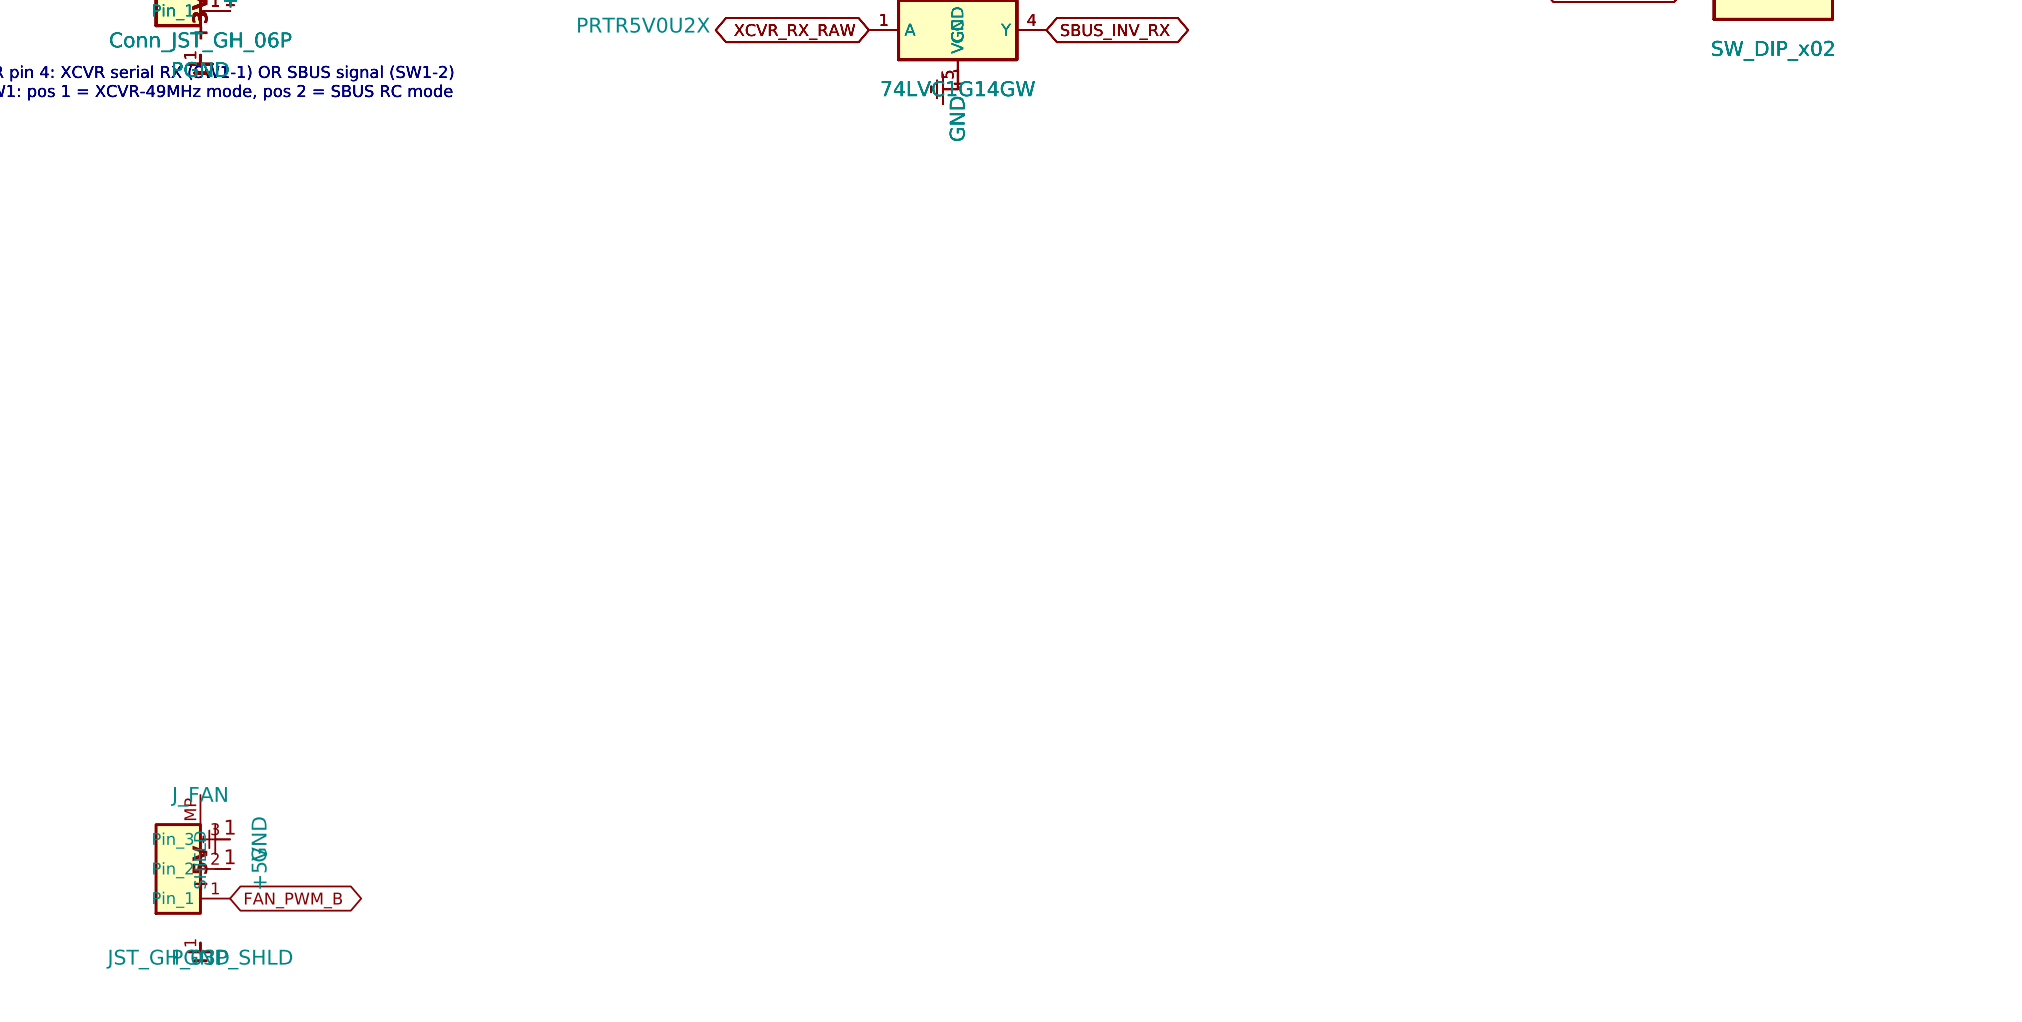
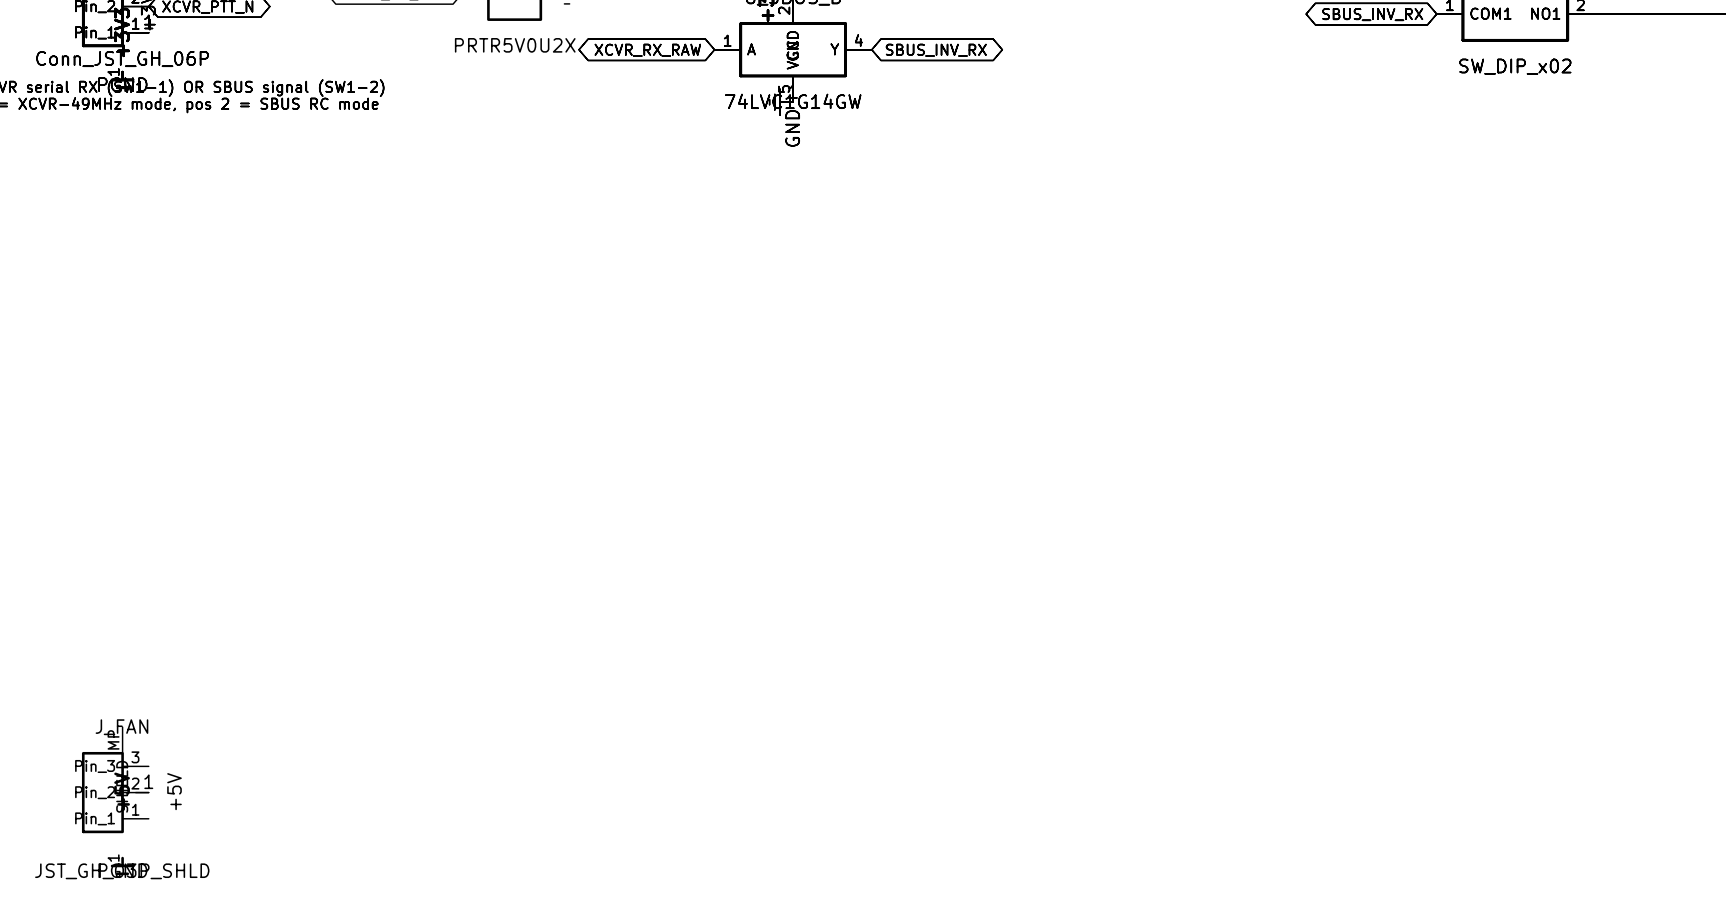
power symbol: GND (216, 839) -> none
global label: FAN_PWM_B (293, 900) -> none

